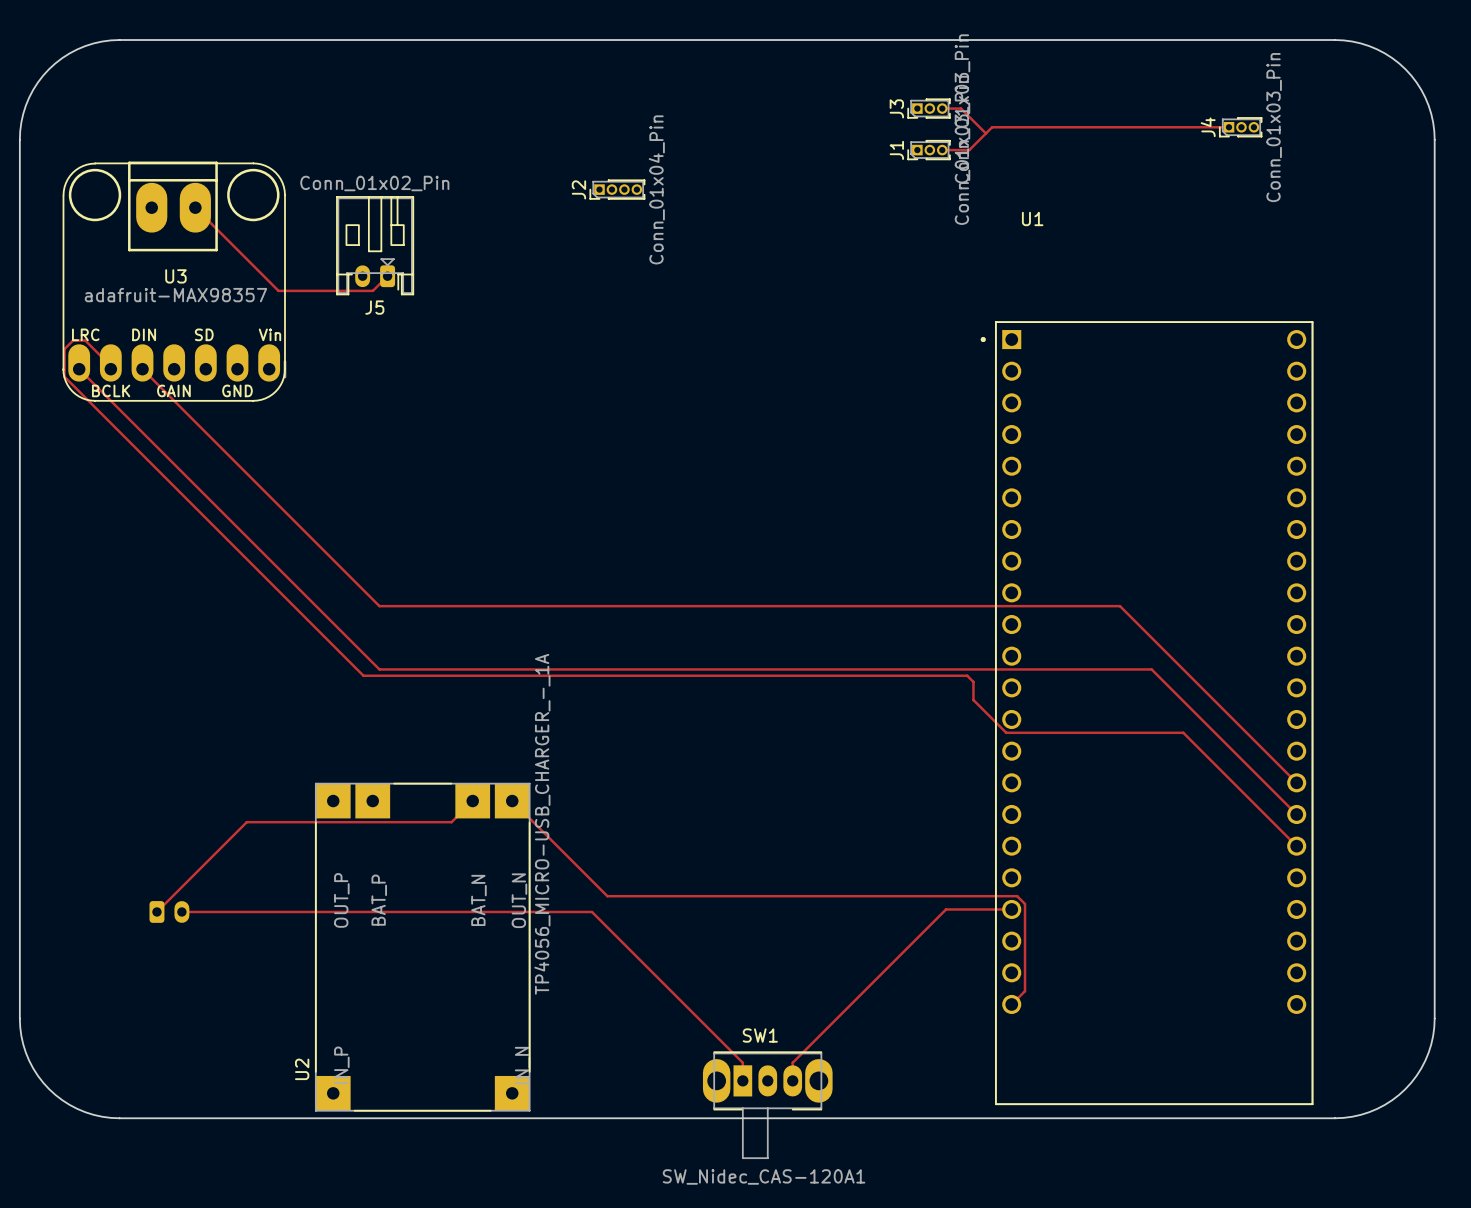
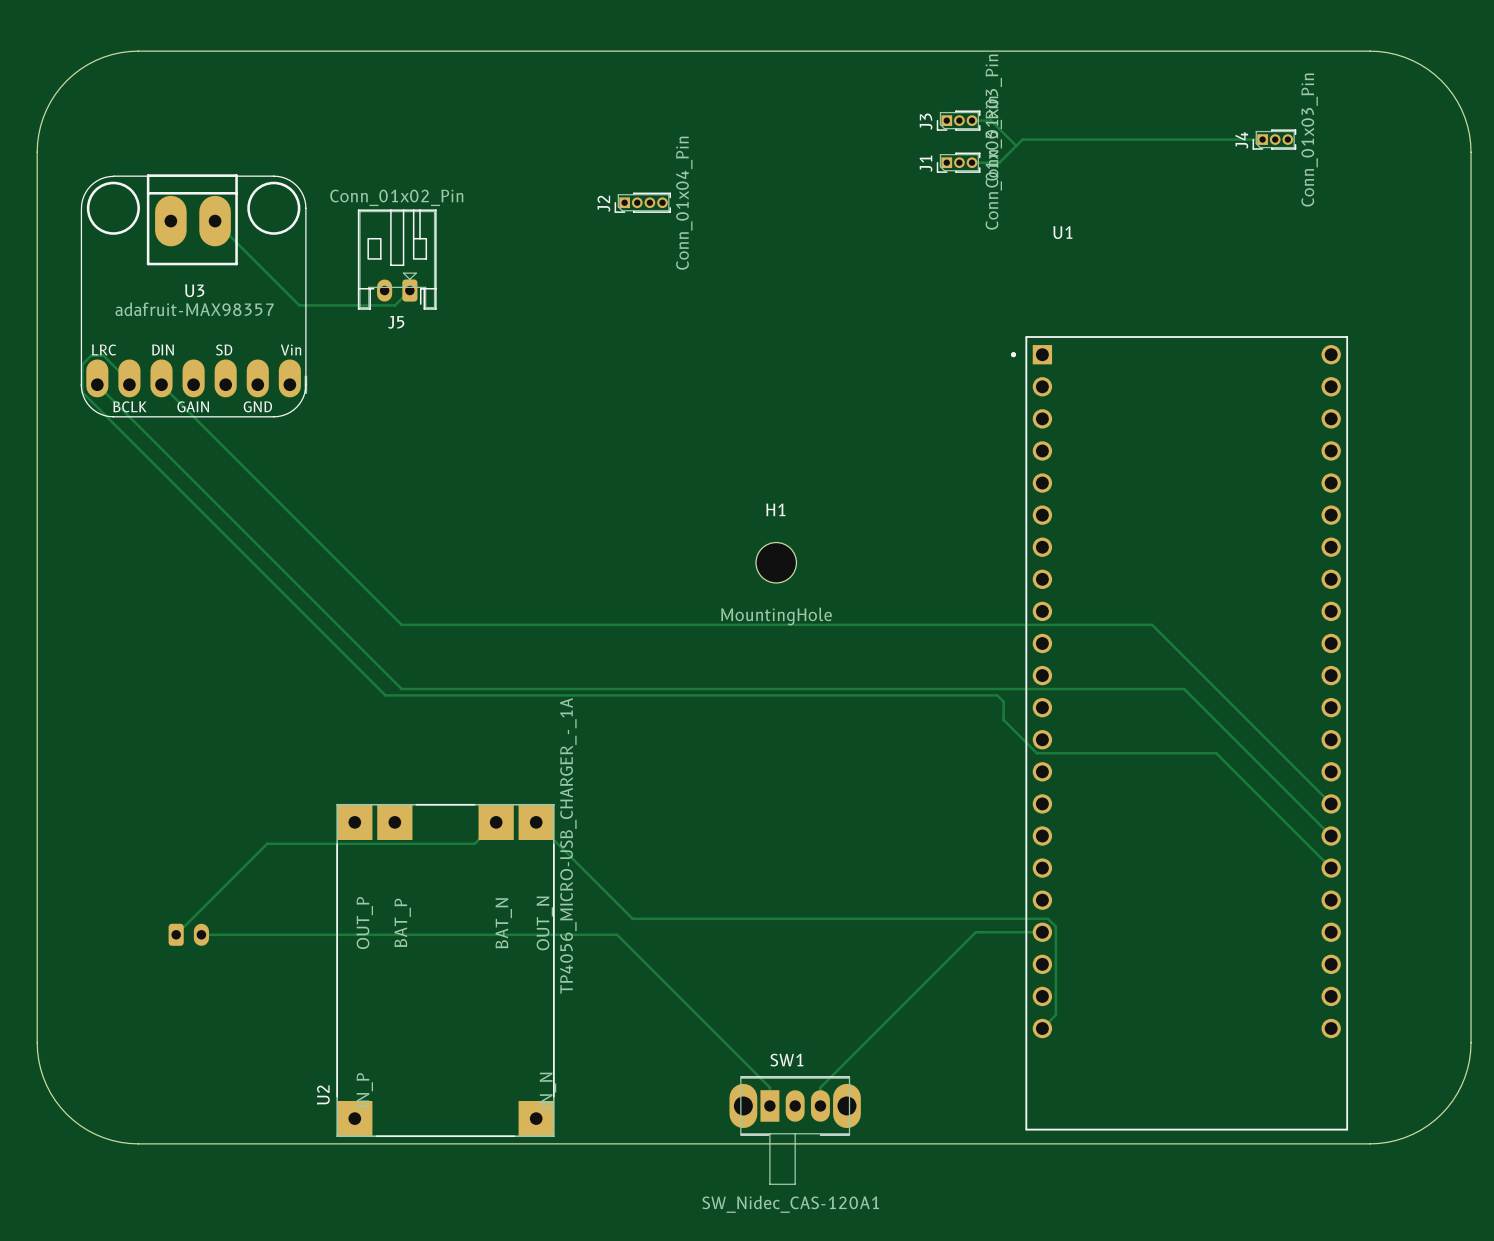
H1: none -> MountingHole (776, 562)

